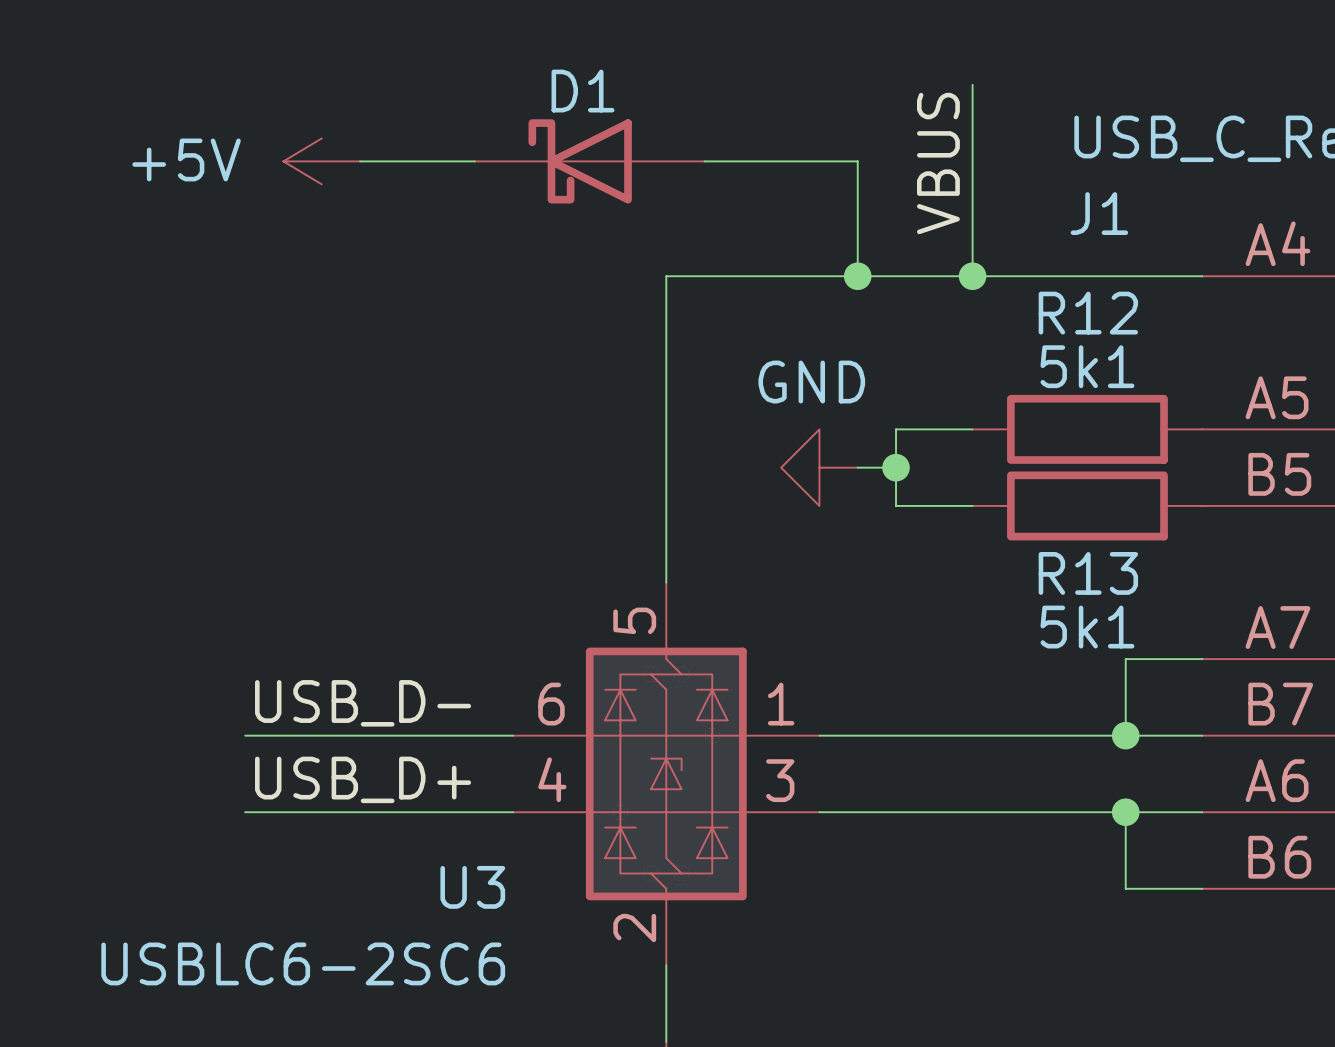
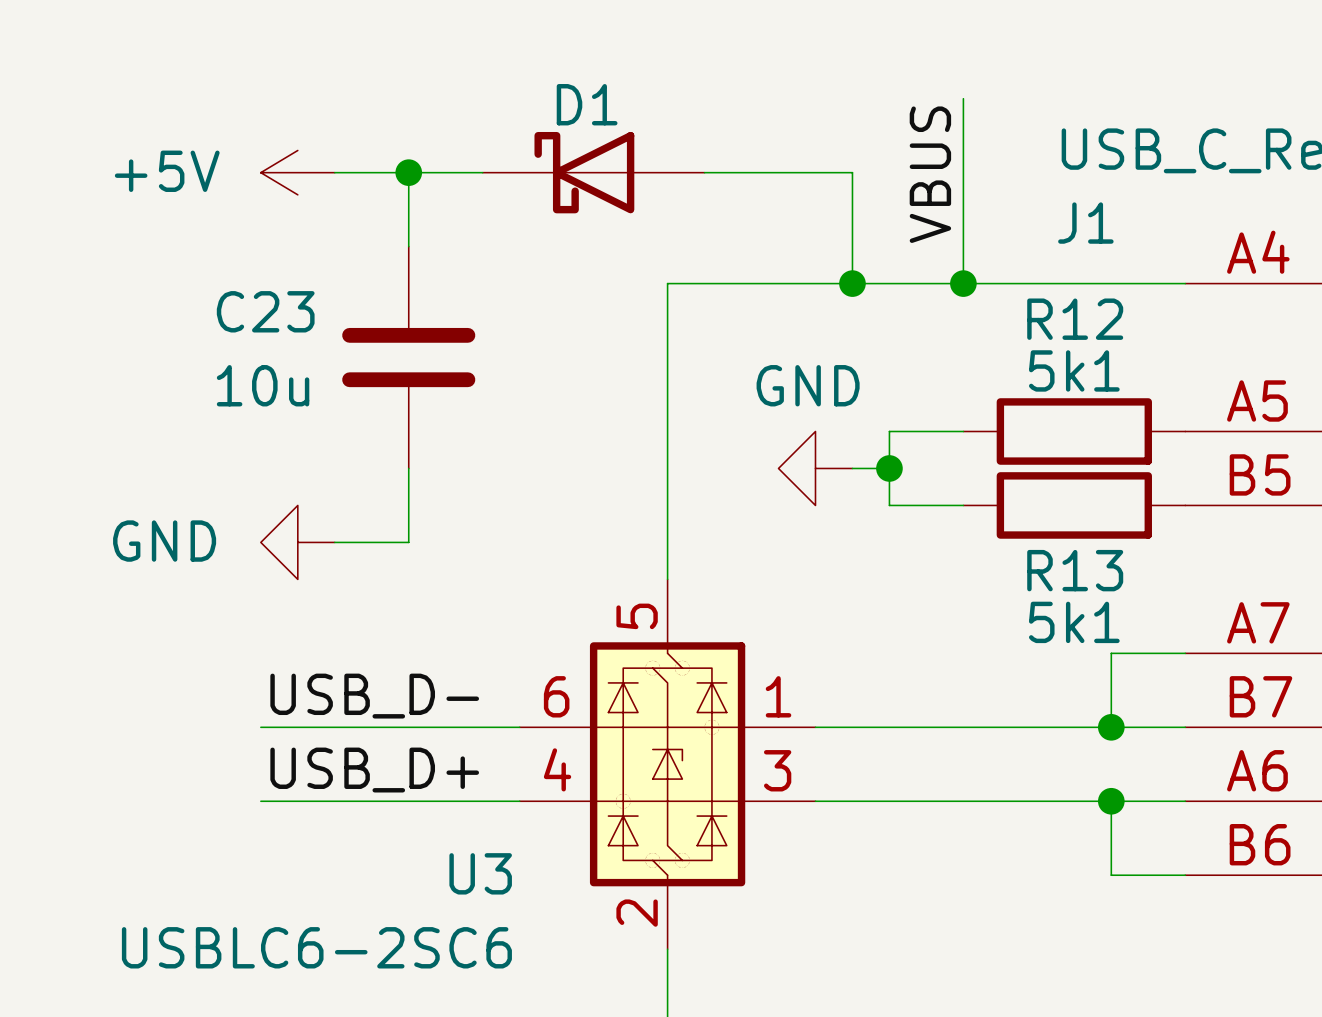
power symbol position: +5V (321, 161) -> +5V (297, 172)
wire: none -> (408, 172) (408, 246)
junction: none -> (408, 172)
C23: none -> 10u (408, 357)
wire: none -> (408, 468) (408, 542) (334, 542)
power symbol: none -> GND (297, 542)

